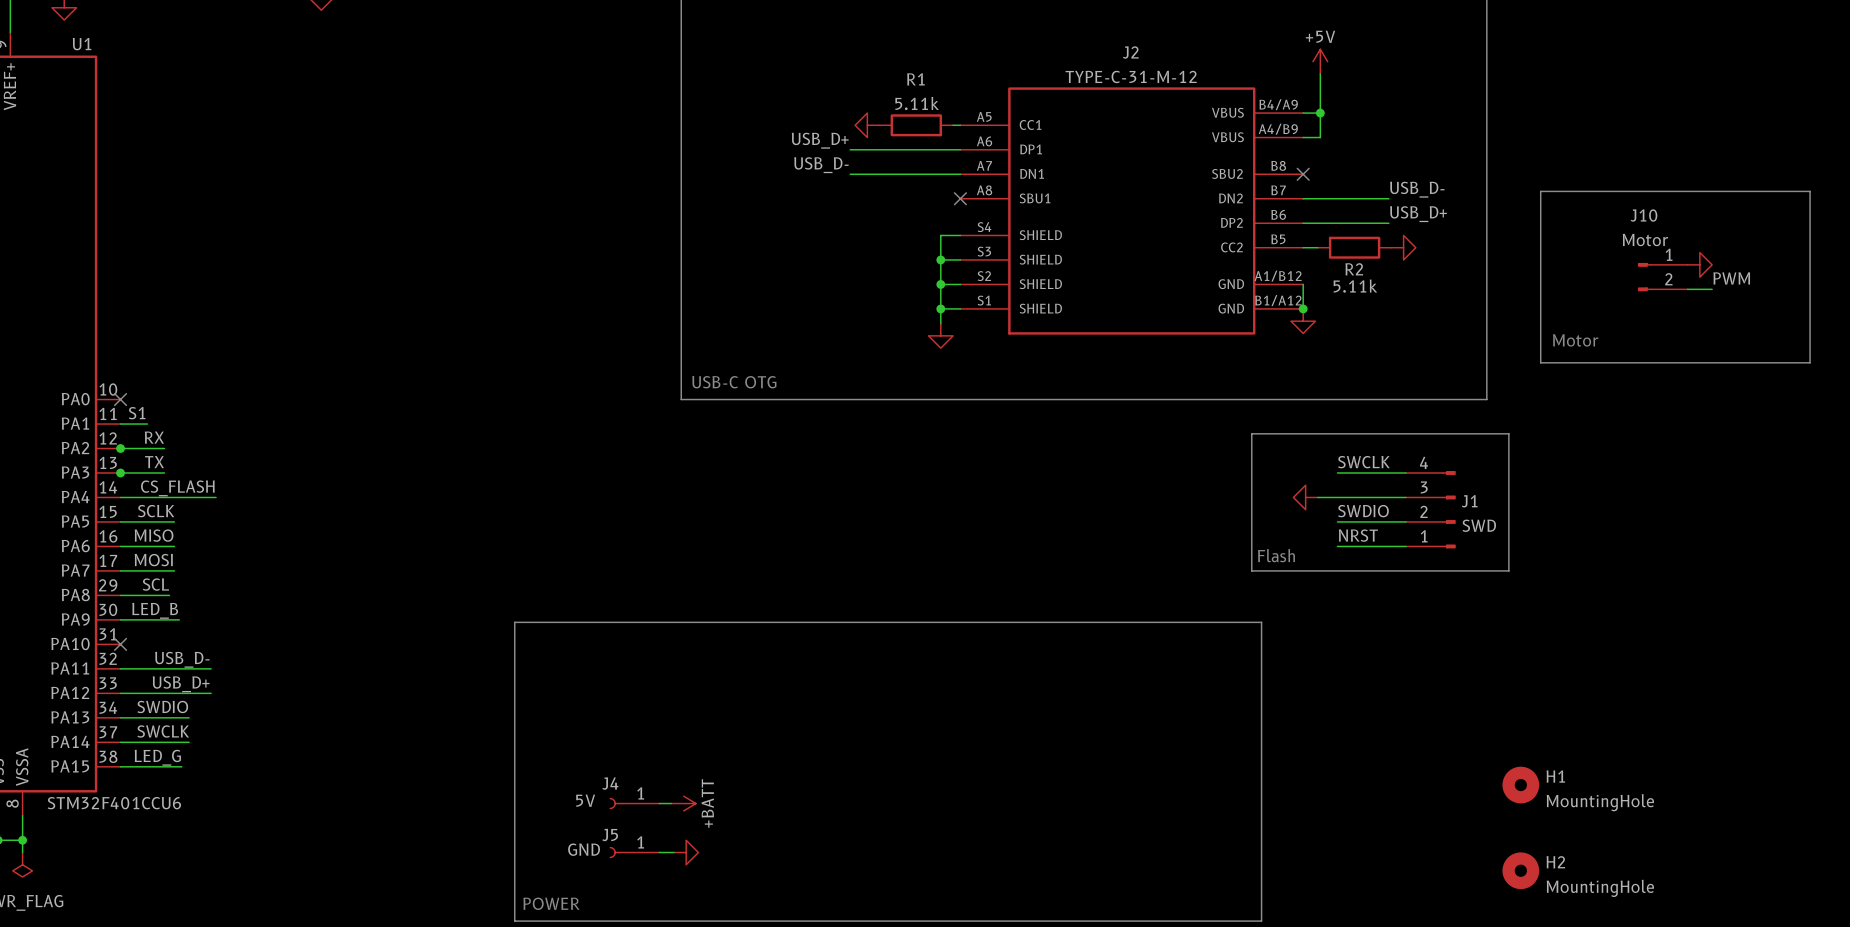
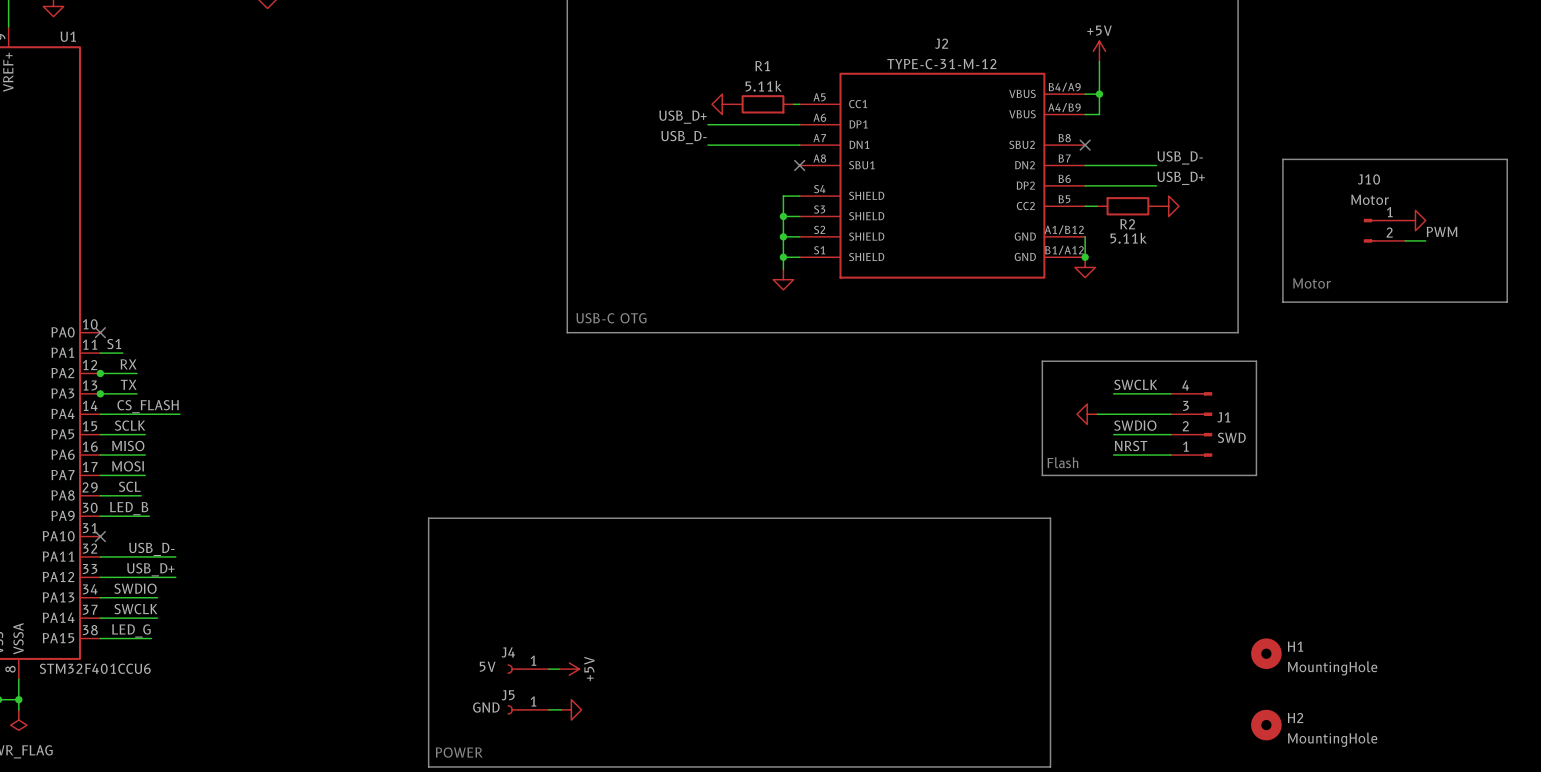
power symbol: +BATT (683, 803) -> +5V (569, 669)

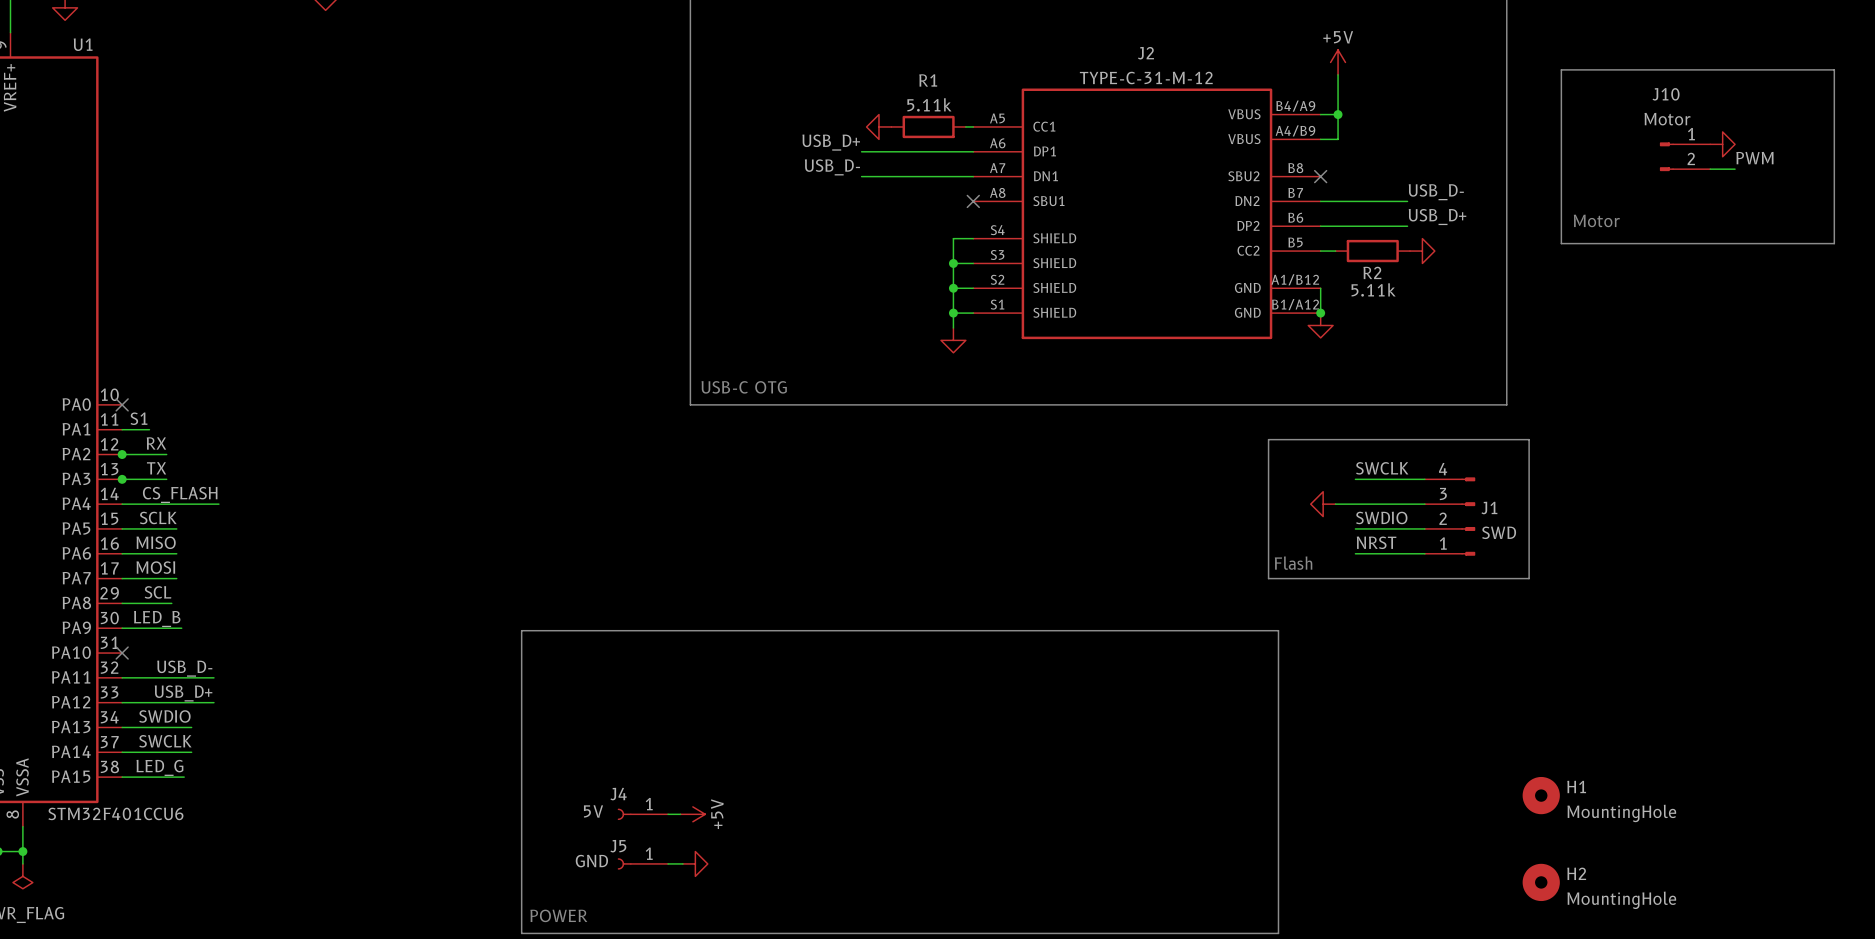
line: (1282, 159) (1507, 159) -> (1561, 193) (1561, 69) (1834, 69) (1834, 193)
line: (1282, 200) (1282, 302) (1507, 302) (1507, 200) -> (1561, 243) (1834, 243)
power symbol position: (1415, 220) -> (1722, 144)
J10 position: (1384, 230) -> (1685, 156)
label position: PWM (1441, 231) -> PWM (1754, 158)
wire: (1405, 240) (1425, 240) -> (1710, 169) (1735, 169)
text position: Motor (1312, 283) -> Motor (1596, 220)

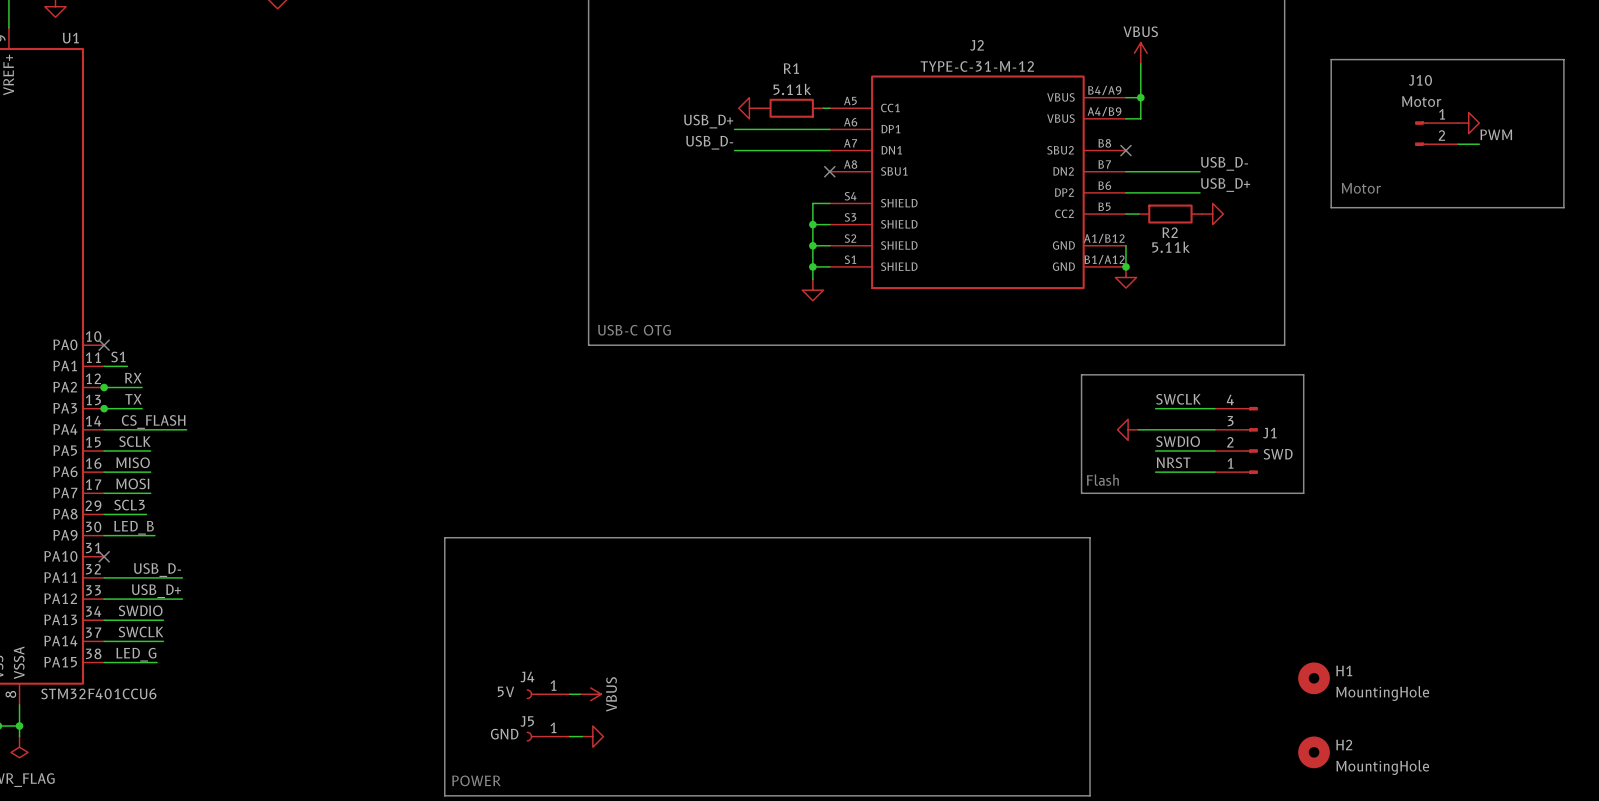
power symbol: +5V (1338, 62) -> VBUS (1140, 53)
label: SCL (157, 592) -> SCL3 (129, 505)
power symbol: +5V (692, 814) -> VBUS (590, 694)

